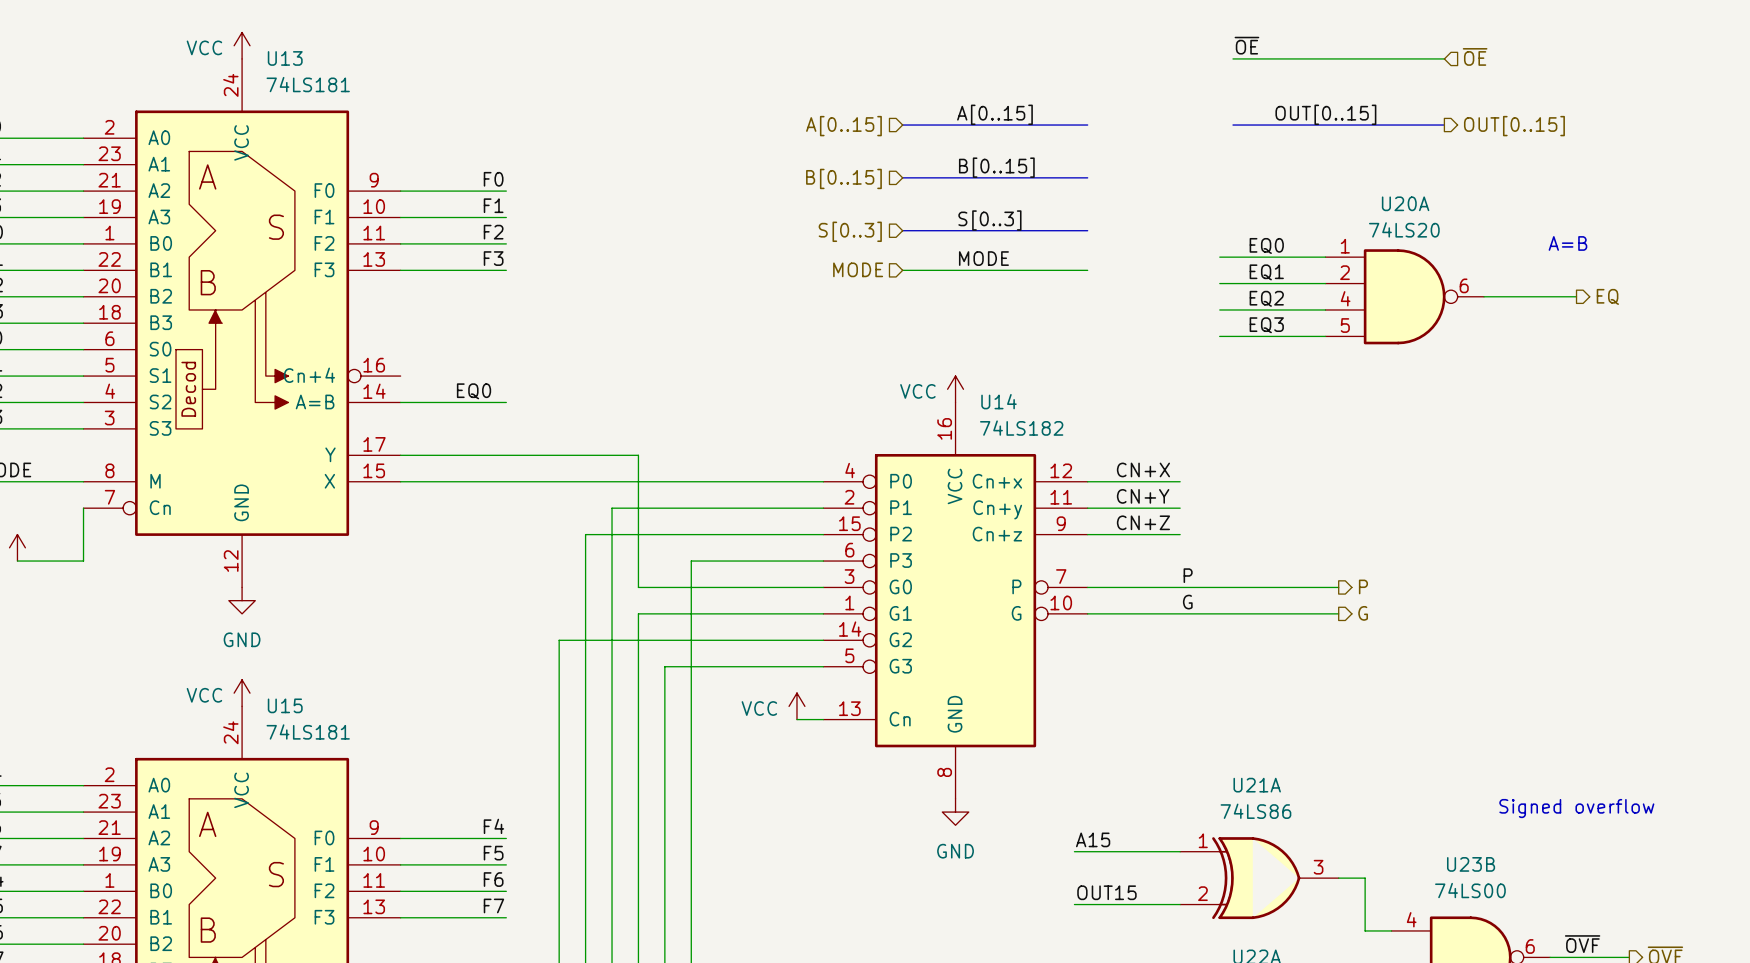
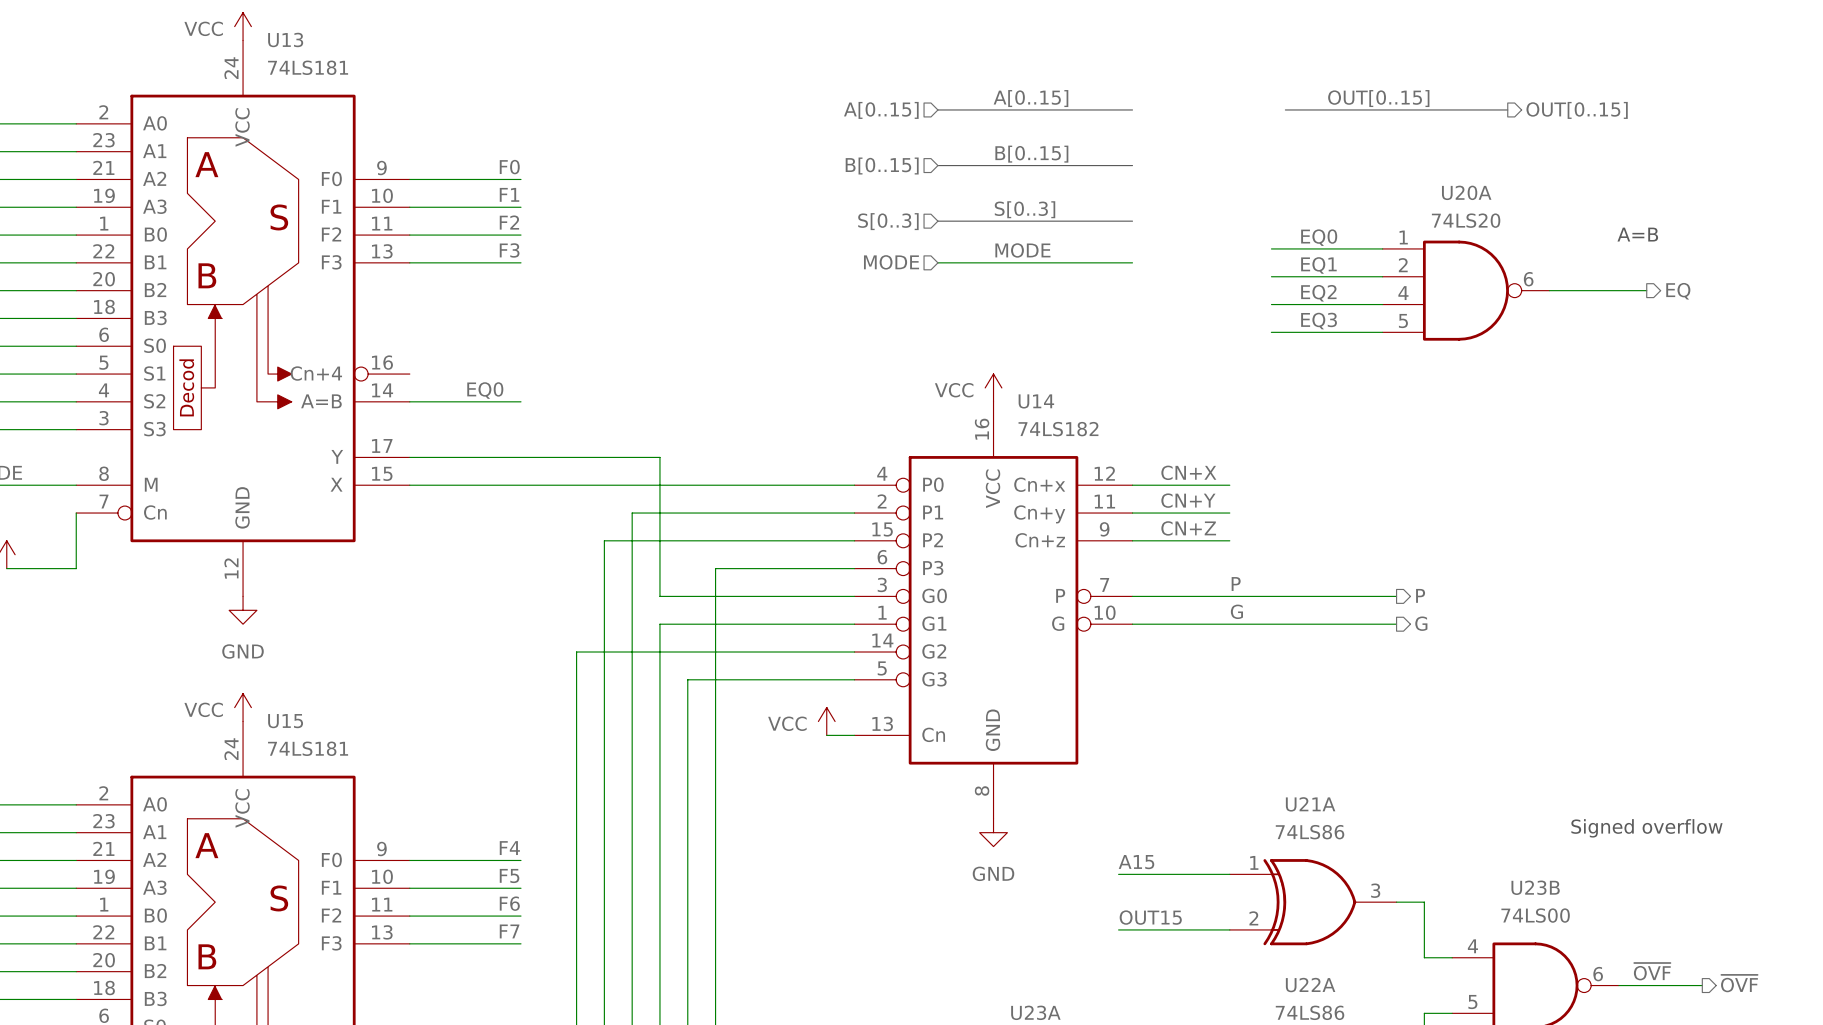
label: ~{OE} (1246, 45) -> none
hierarchical label: ~{OE} (1475, 56) -> none
wire: (1233, 58) (1444, 58) -> none

